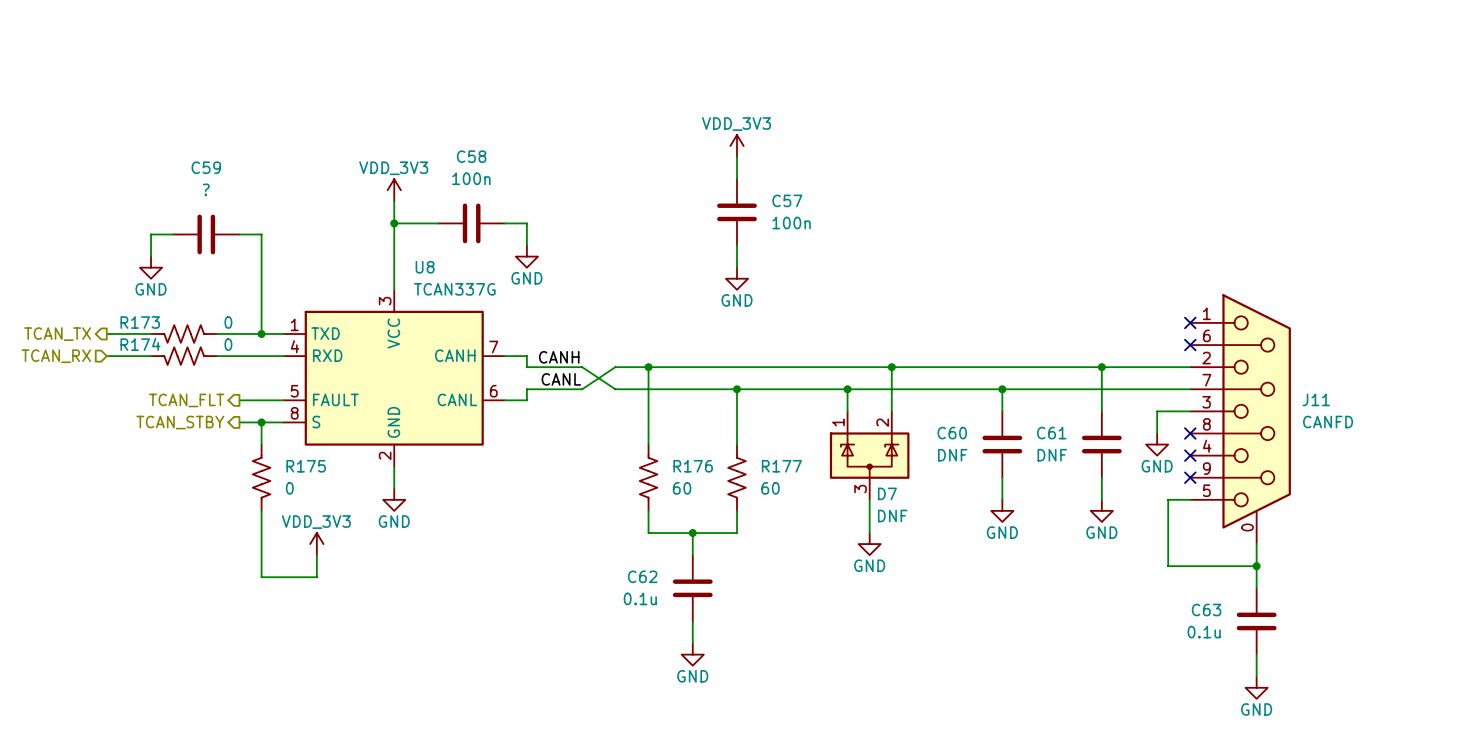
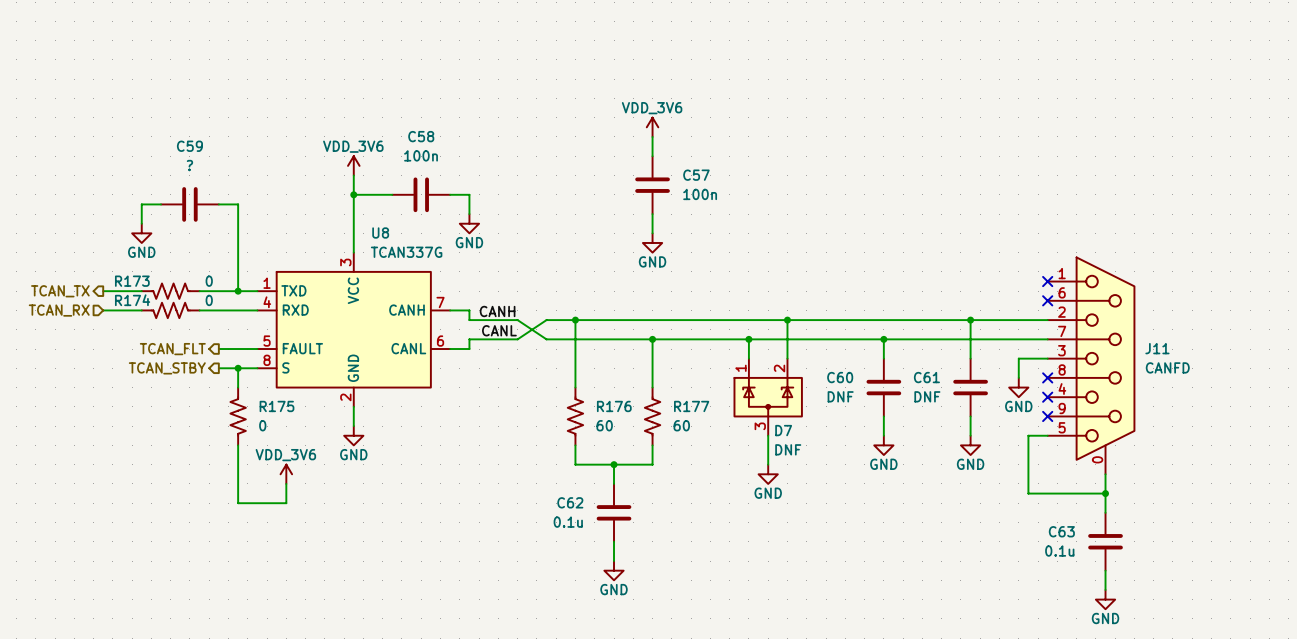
power symbol: VDD_3V3 (737, 146) -> VDD_3V6 (652, 127)
power symbol: VDD_3V3 (394, 190) -> VDD_3V6 (353, 165)
power symbol: VDD_3V3 (316, 544) -> VDD_3V6 (286, 474)

